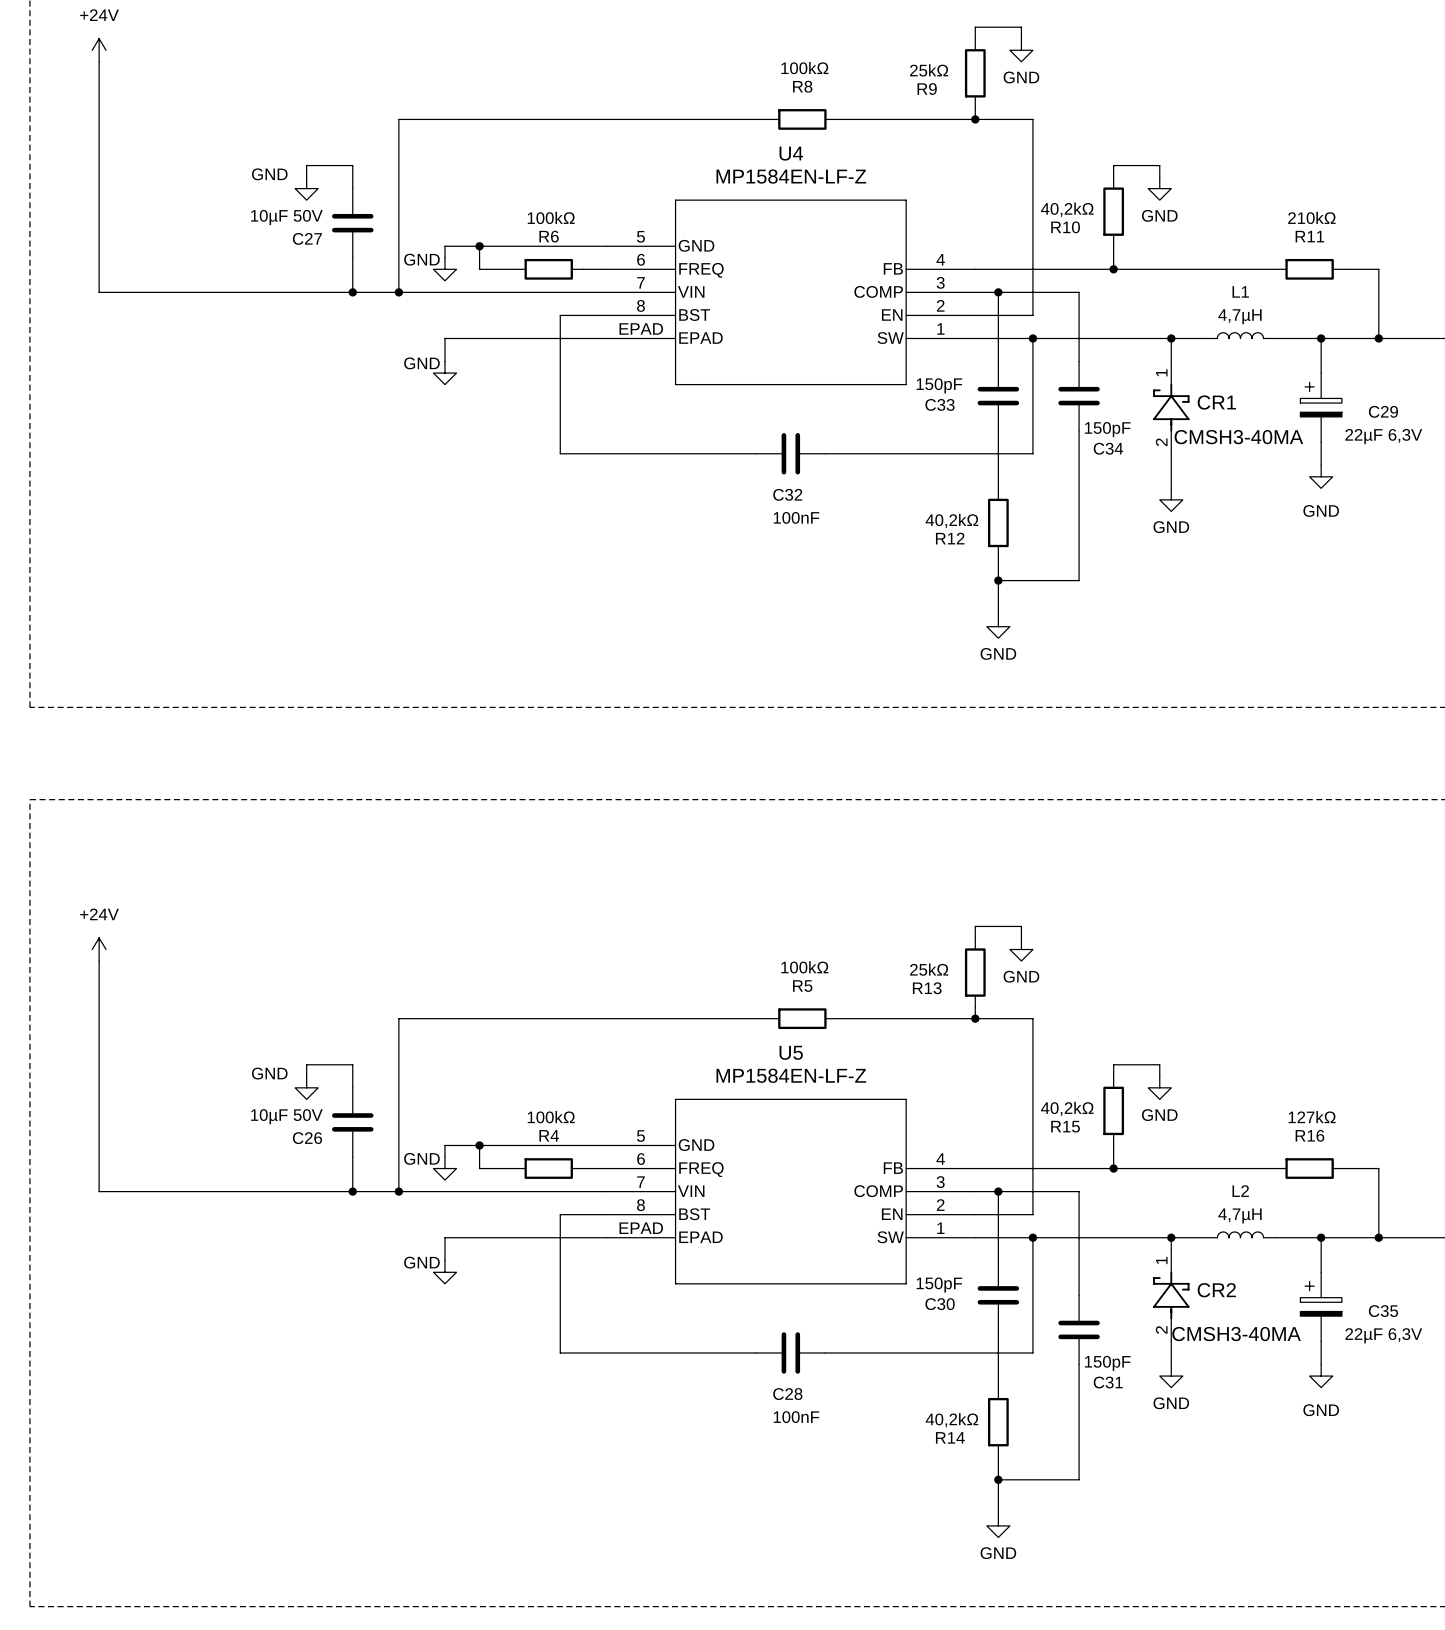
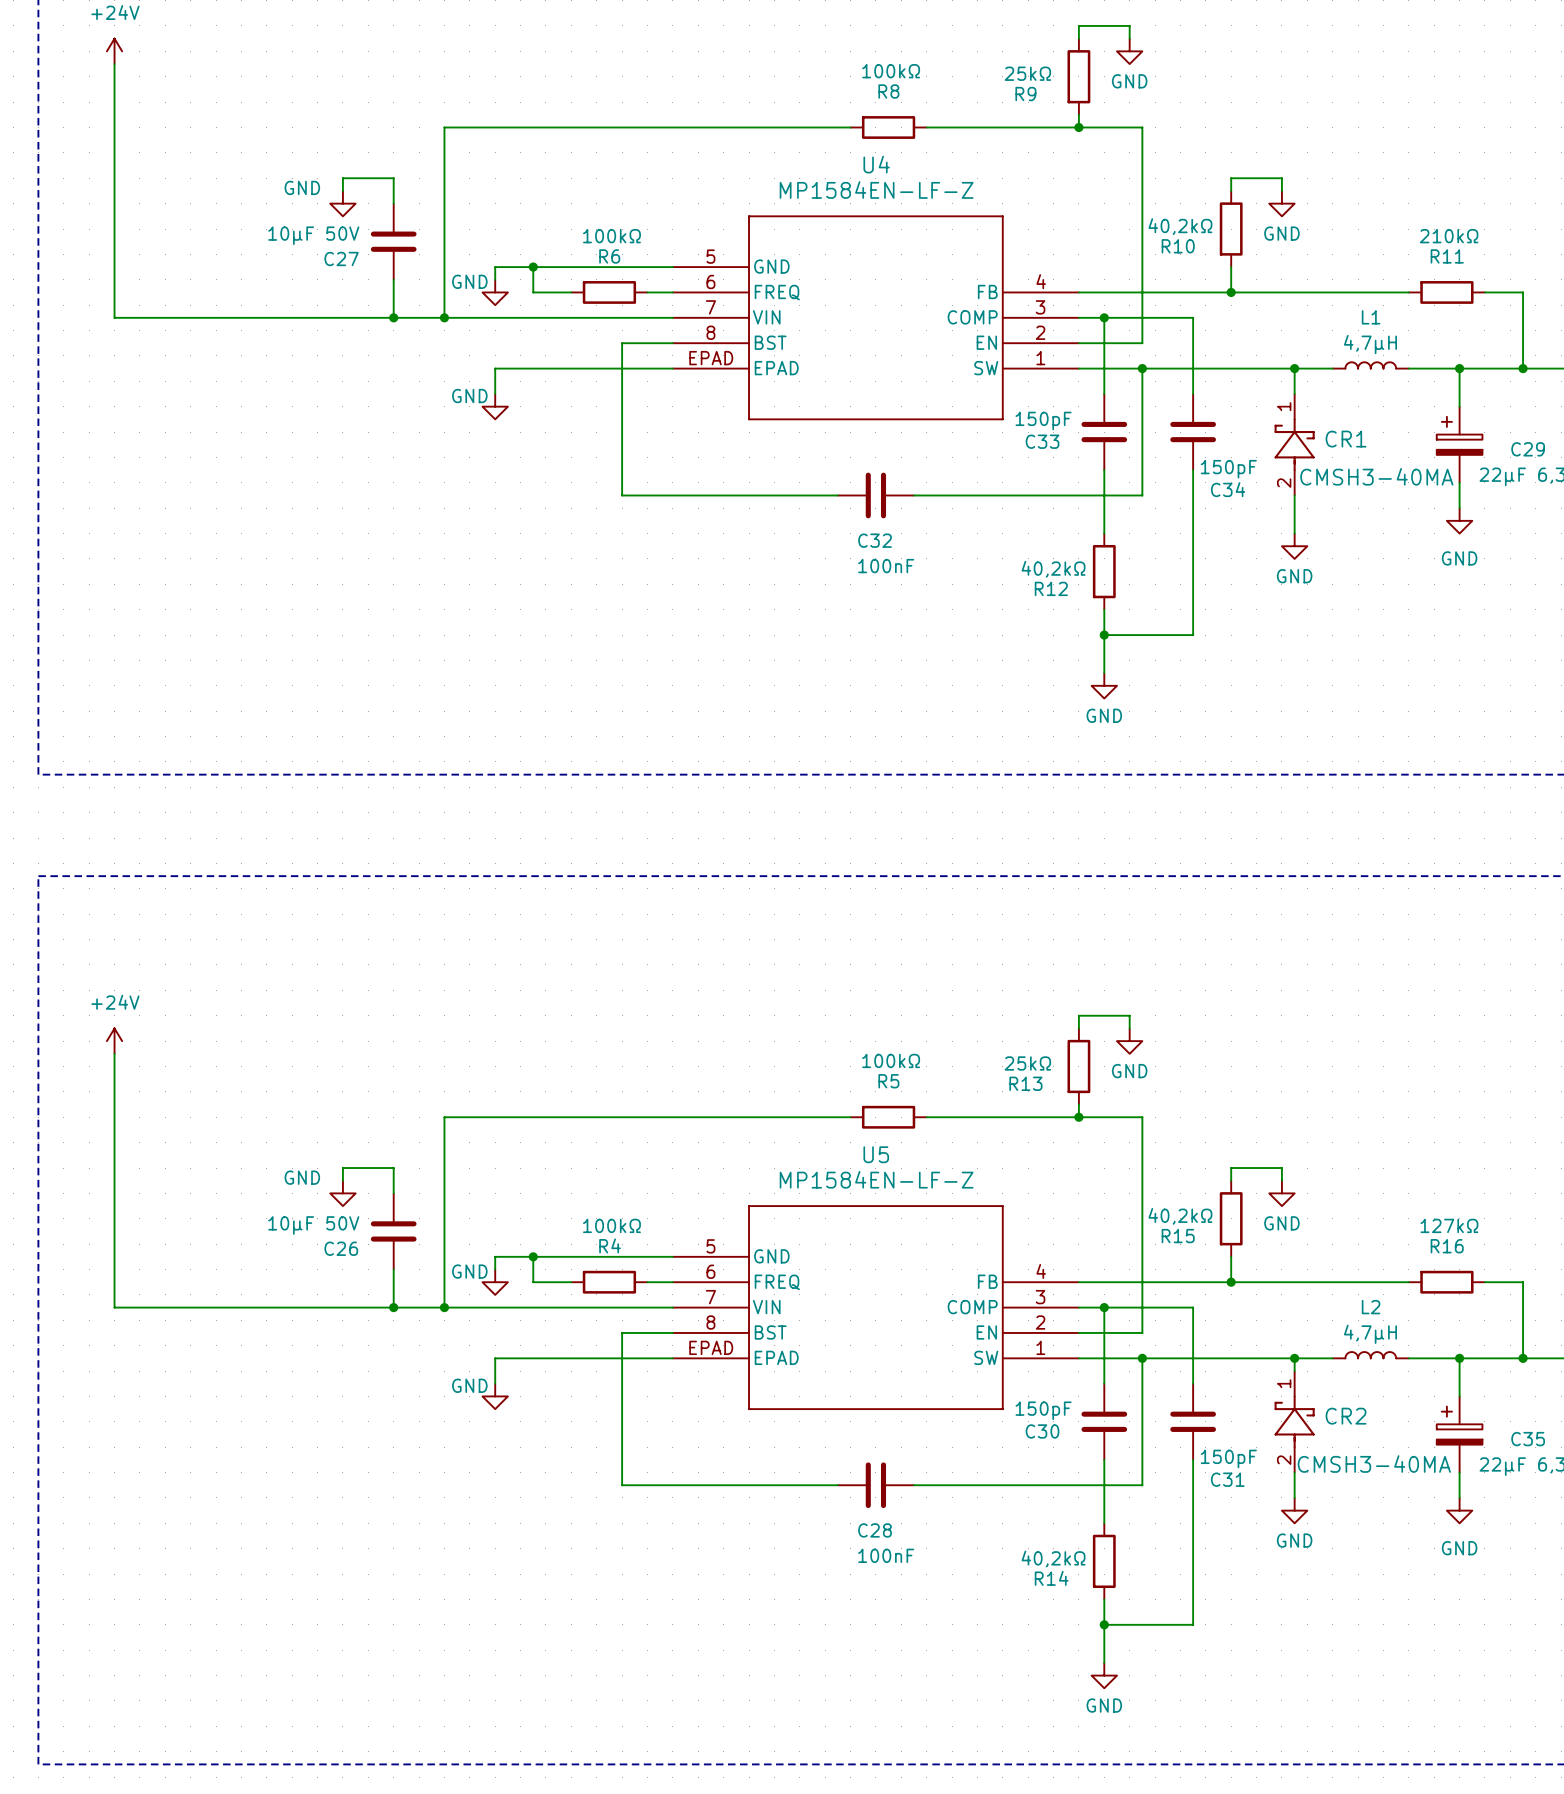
C31 position: (1079, 1329) -> (1193, 1421)

